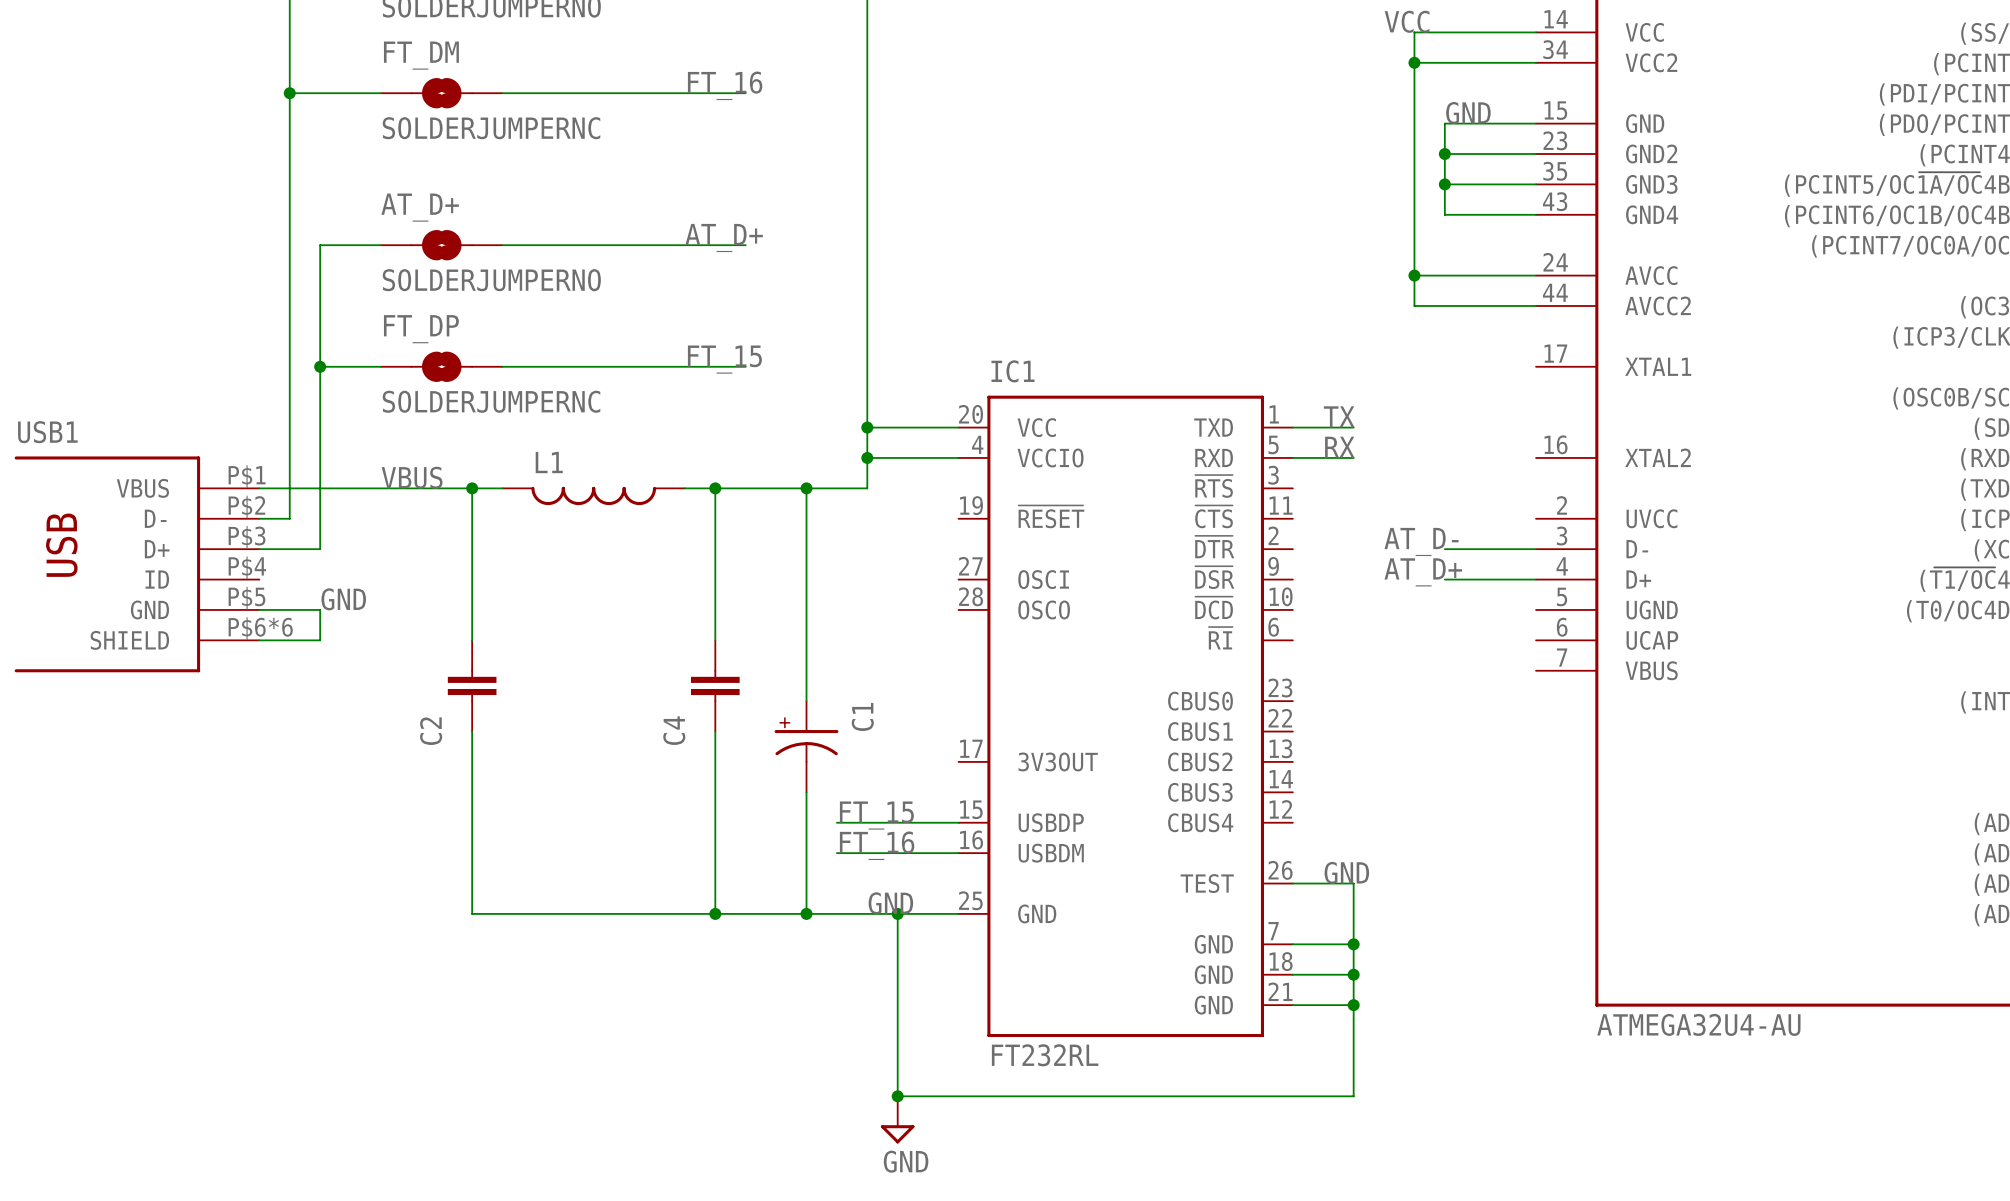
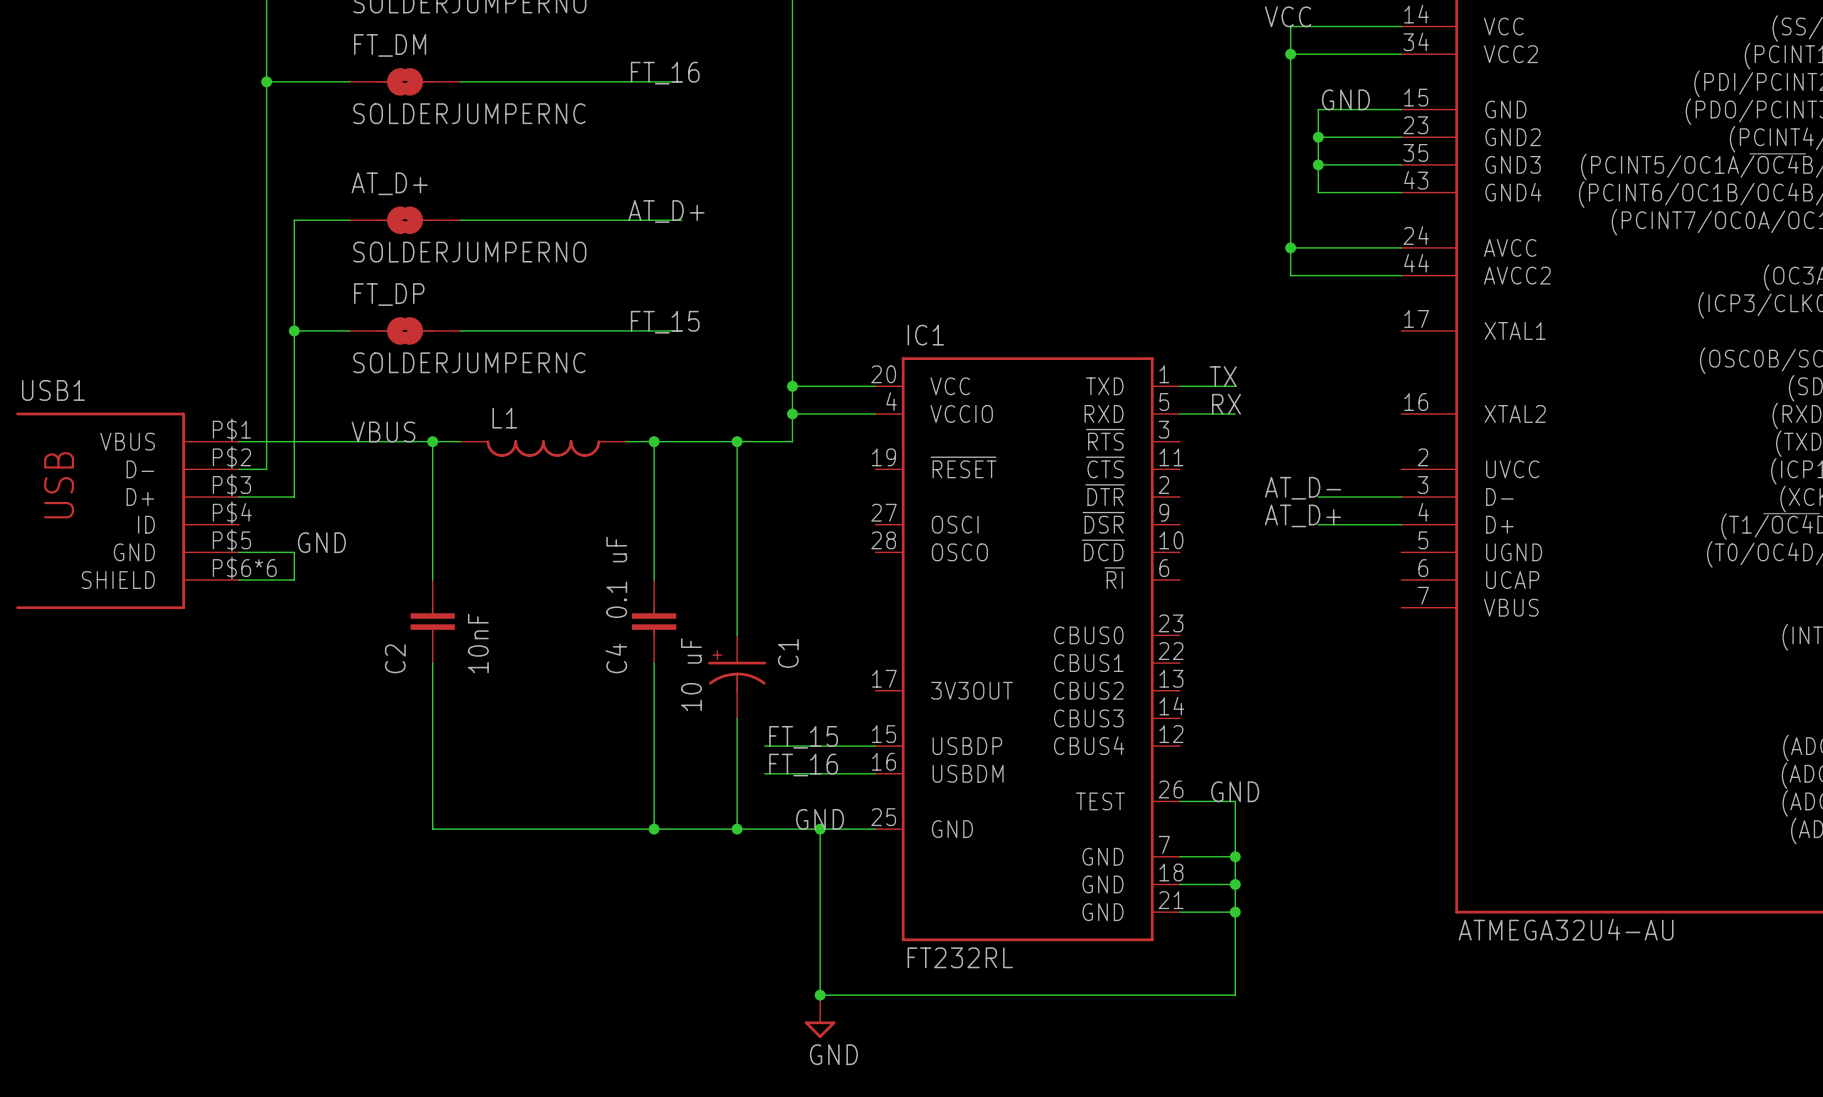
C4 value: none -> 0.1 uF (616, 577)
C2 value: none -> 10nF (478, 643)
C1 value: none -> 10 uF (691, 674)

